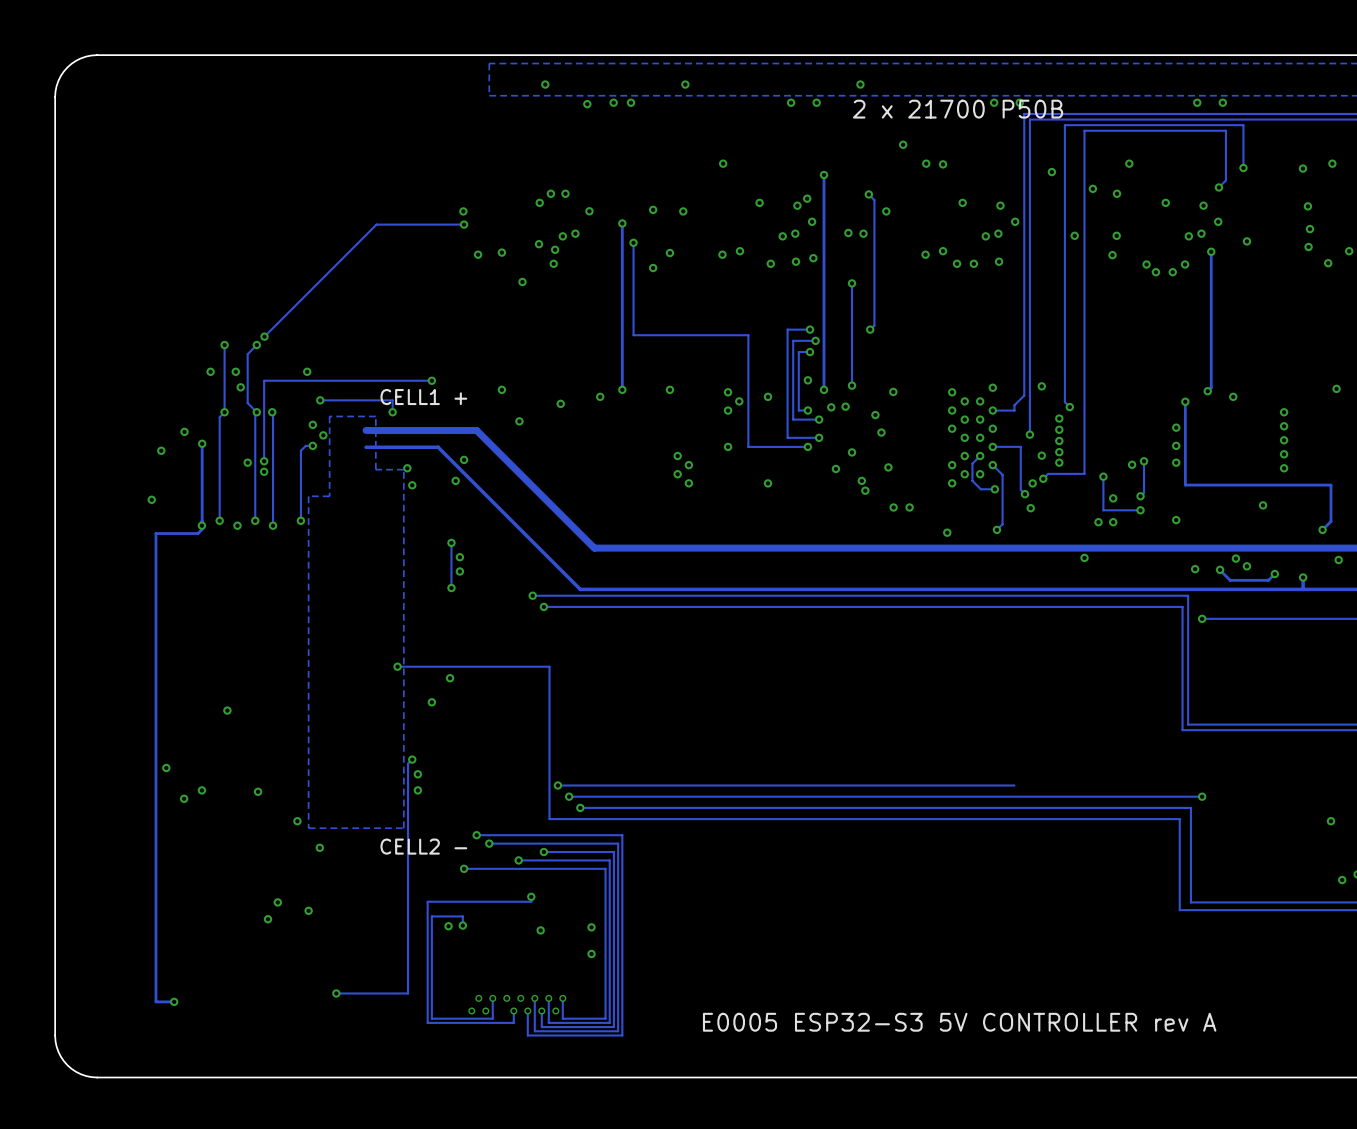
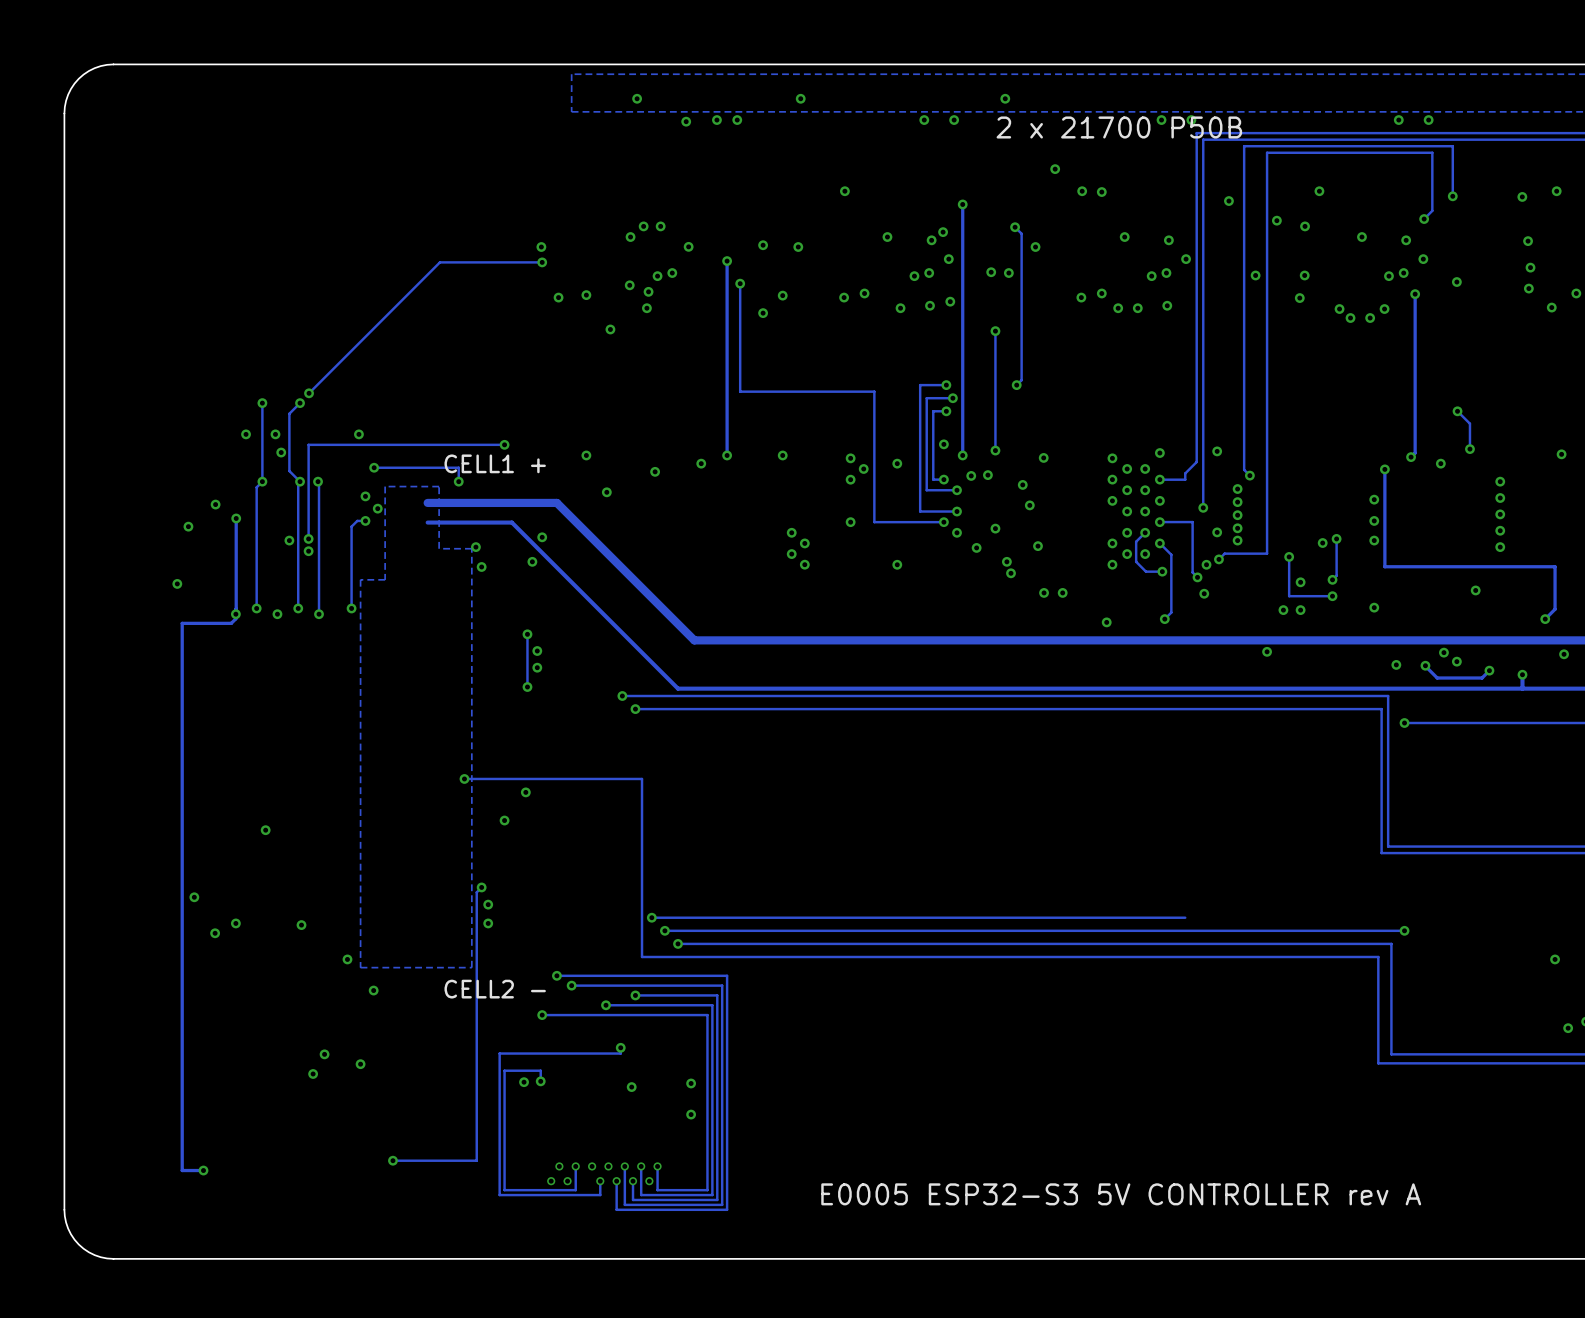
track: none -> (1457, 411) (1469, 423) (1469, 449)
via: none -> (1457, 411)
via: none -> (1469, 449)
via: none -> (956, 532)

